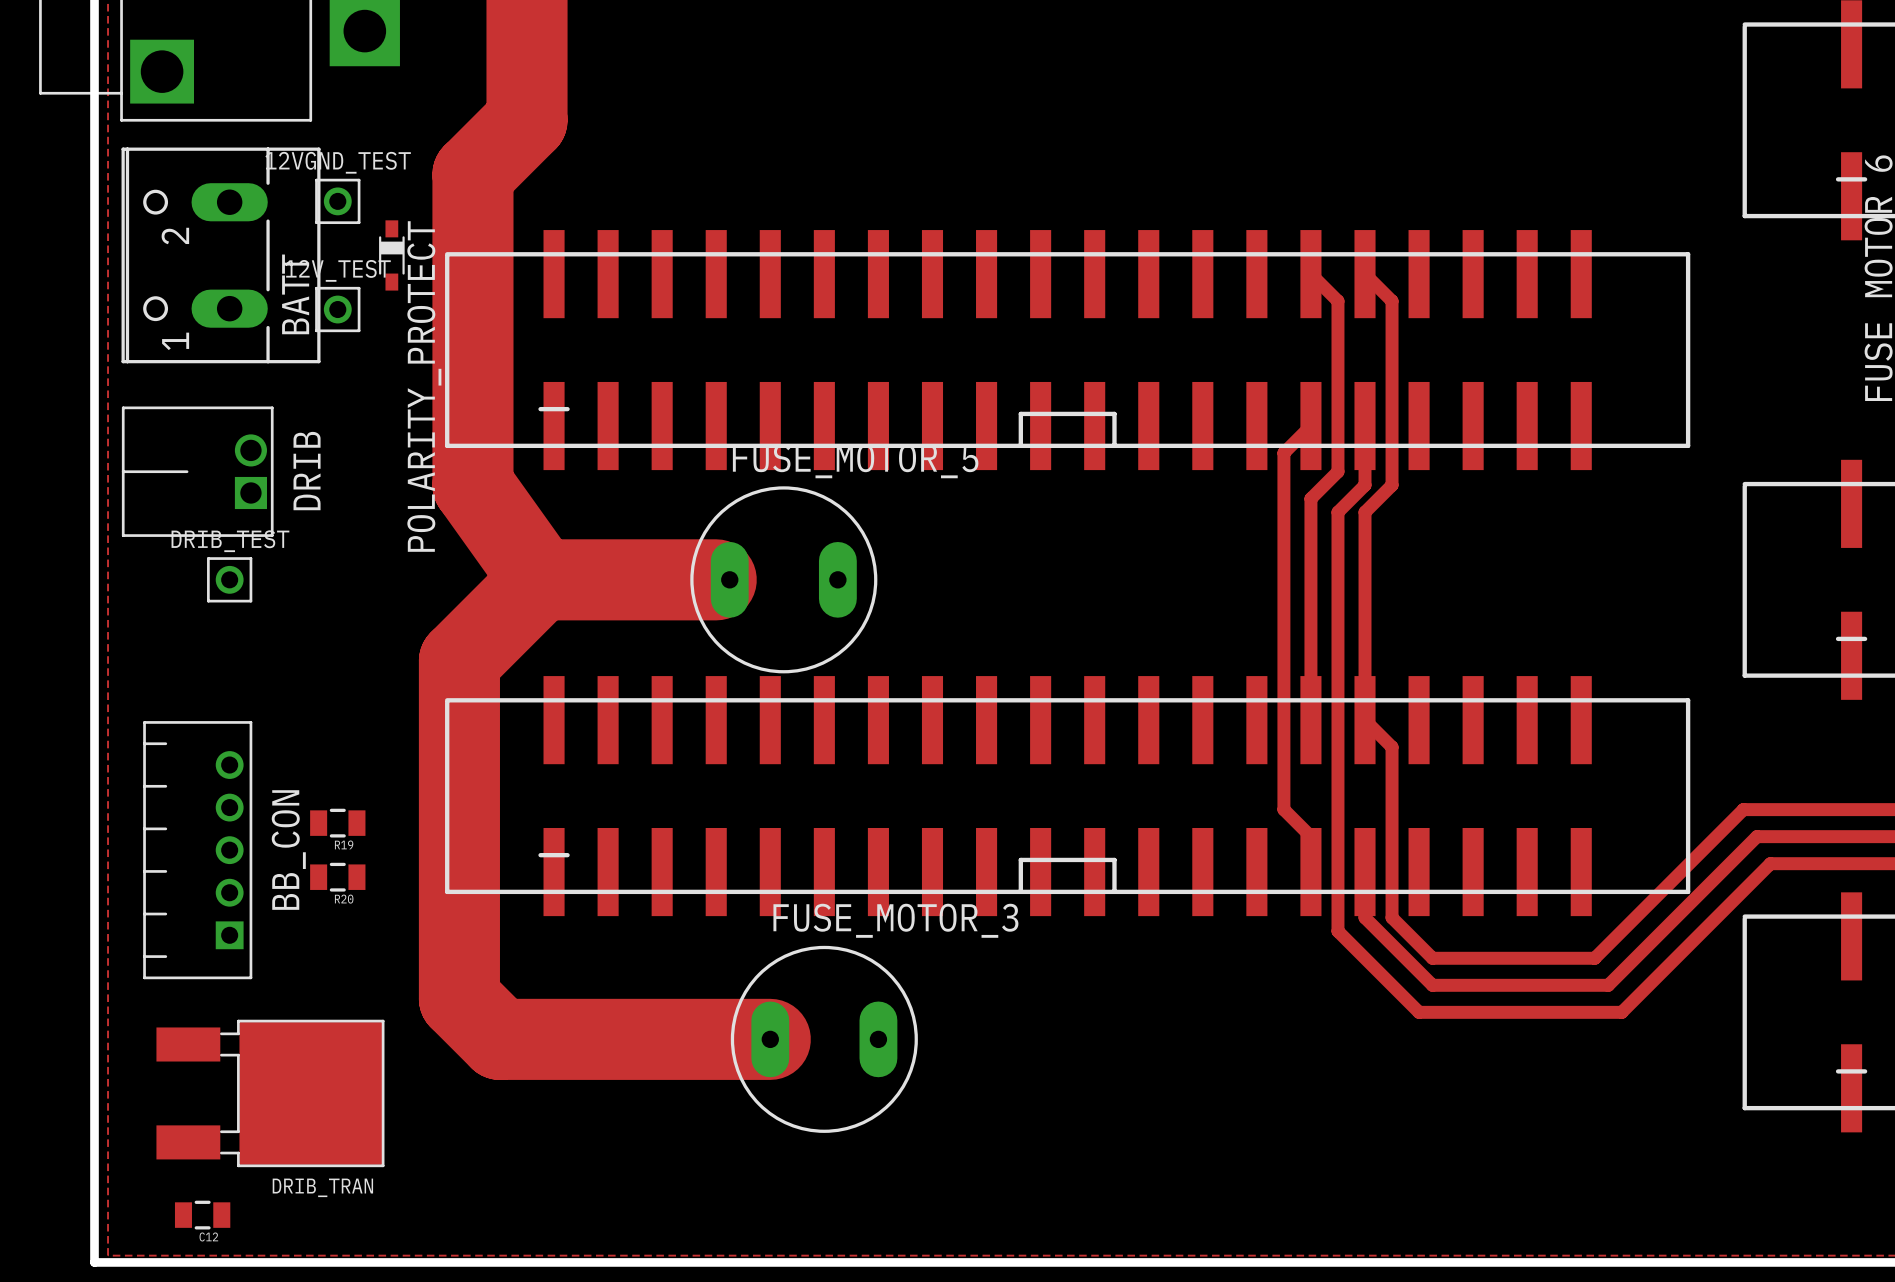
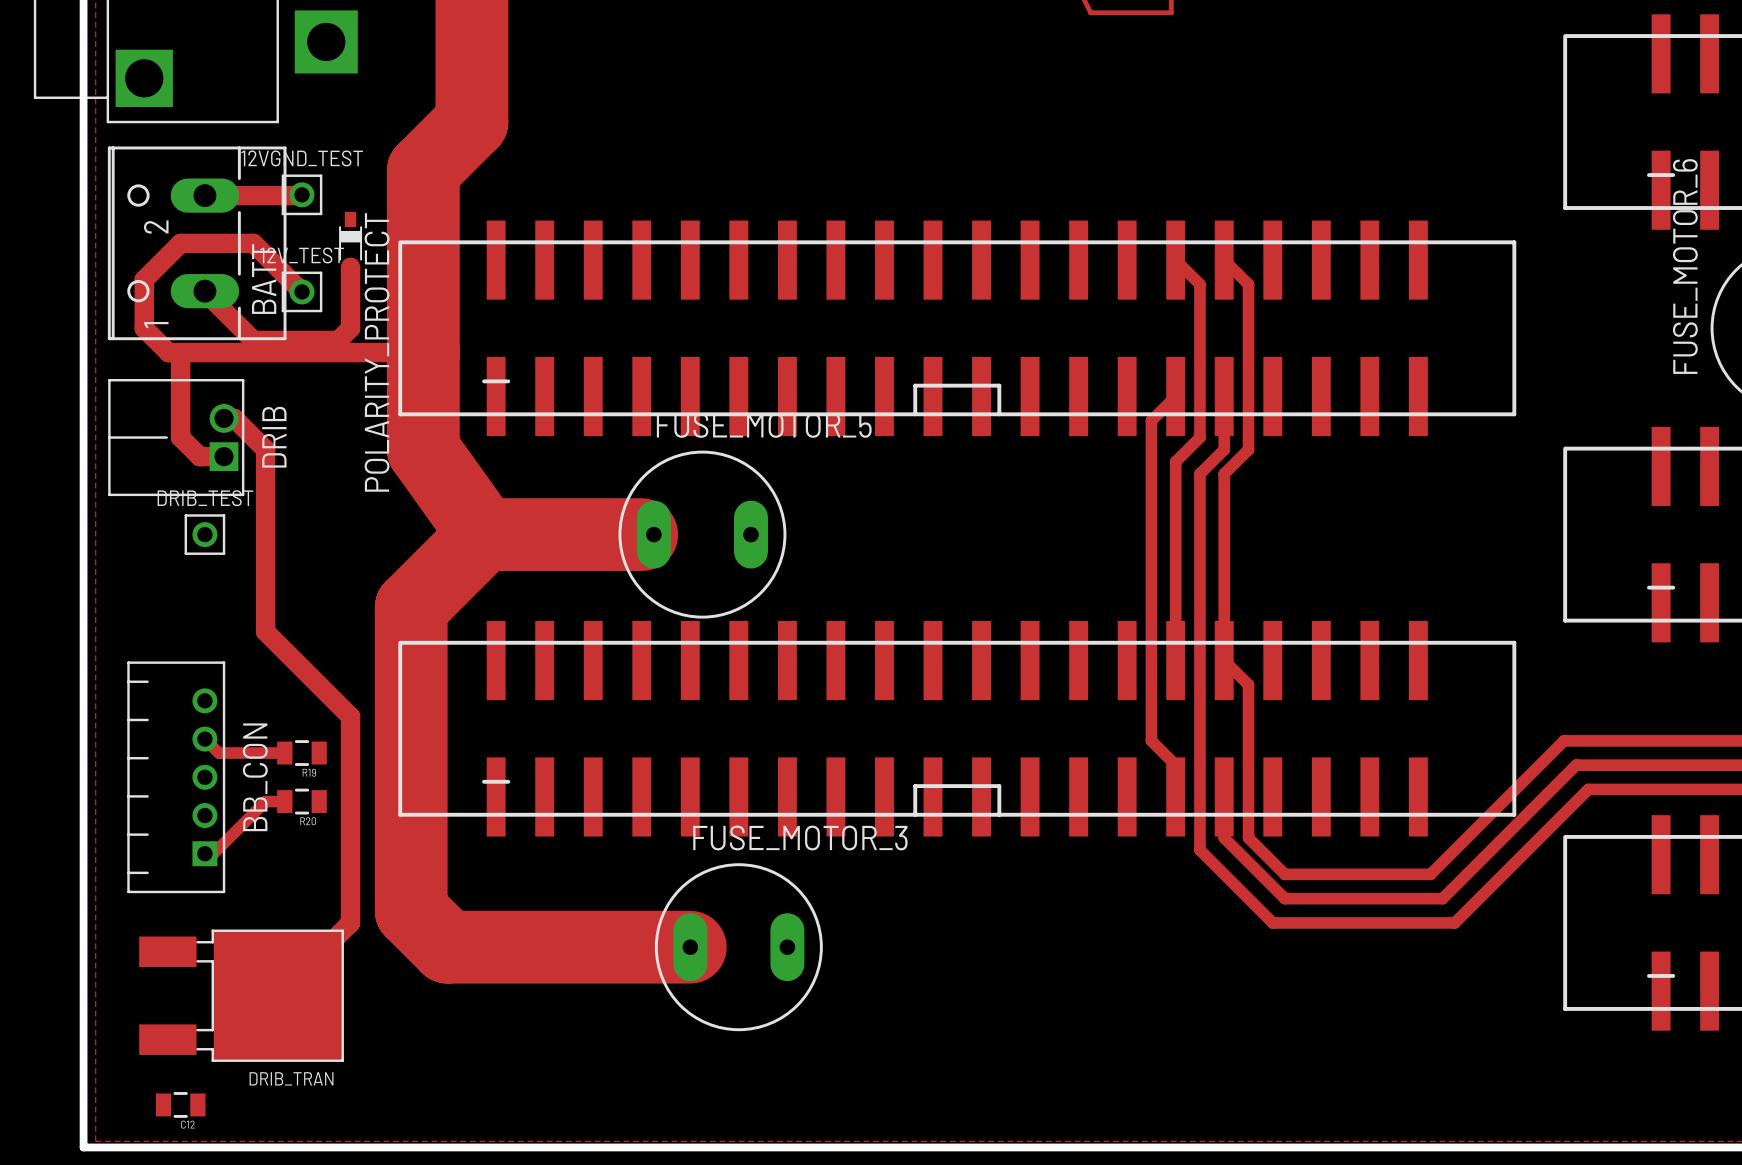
track: none -> (302, 194) (204, 195)
track: none -> (350, 267) (350, 328) (338, 340) (253, 340) (204, 291)
track: none -> (302, 291) (253, 243) (180, 243) (144, 279) (144, 328) (168, 352) (423, 352)
track: none -> (180, 352) (180, 437) (199, 456) (224, 456)
track: none -> (224, 418) (234, 418) (265, 449) (265, 631) (350, 716) (350, 922) (277, 995)
track: none -> (204, 739) (218, 753) (284, 753)
track: none -> (284, 801) (265, 801) (213, 853) (204, 853)

